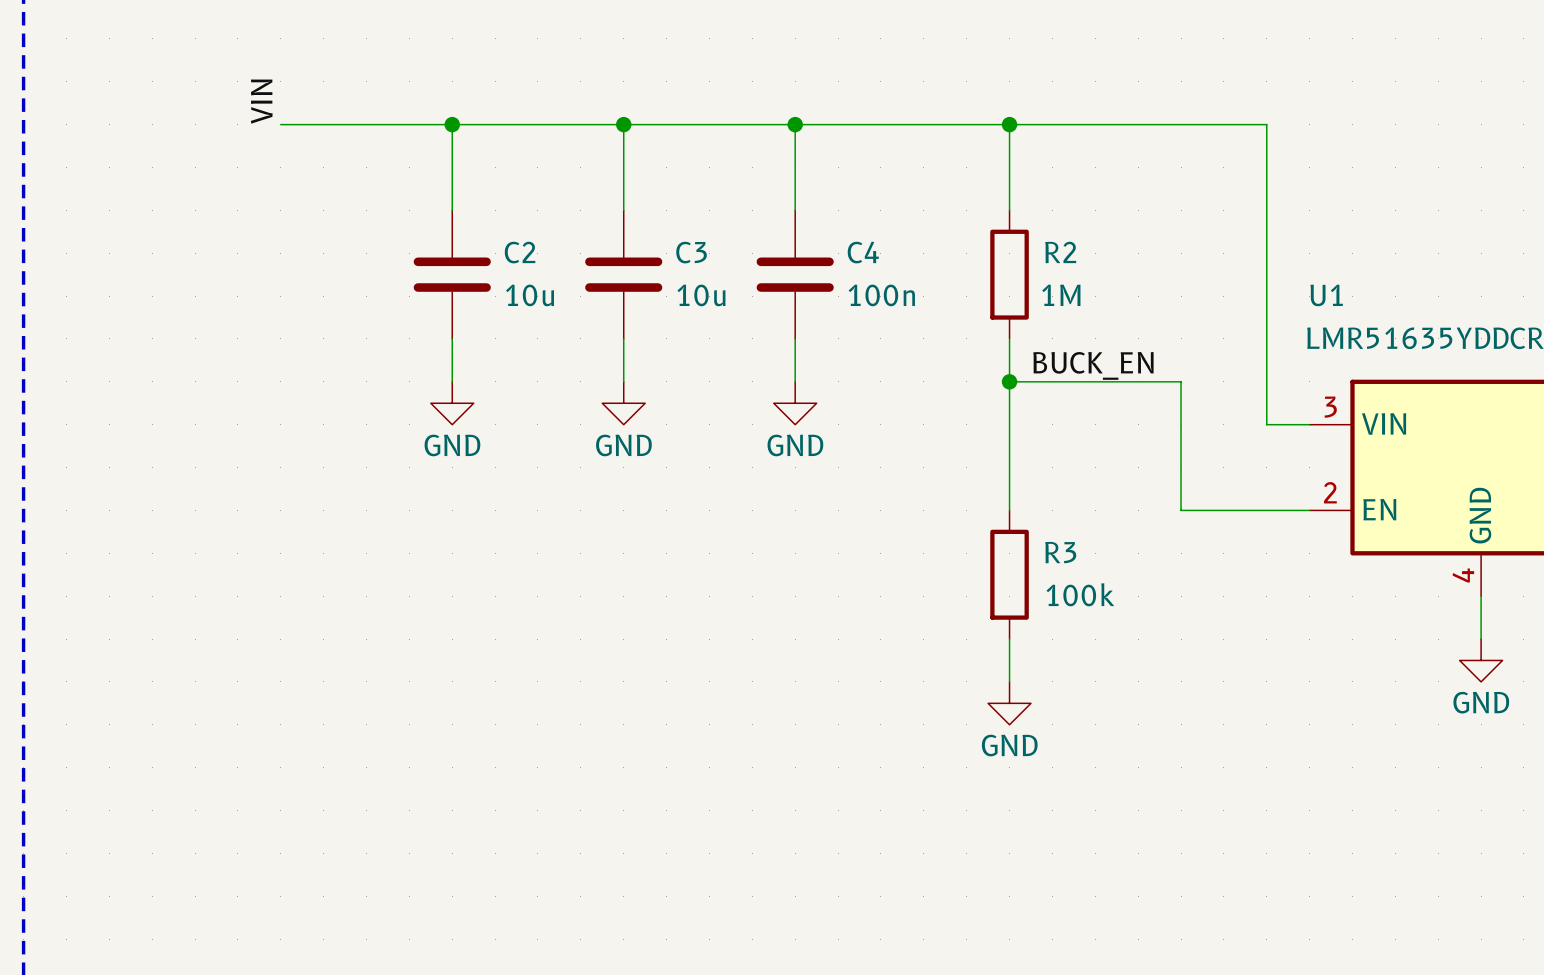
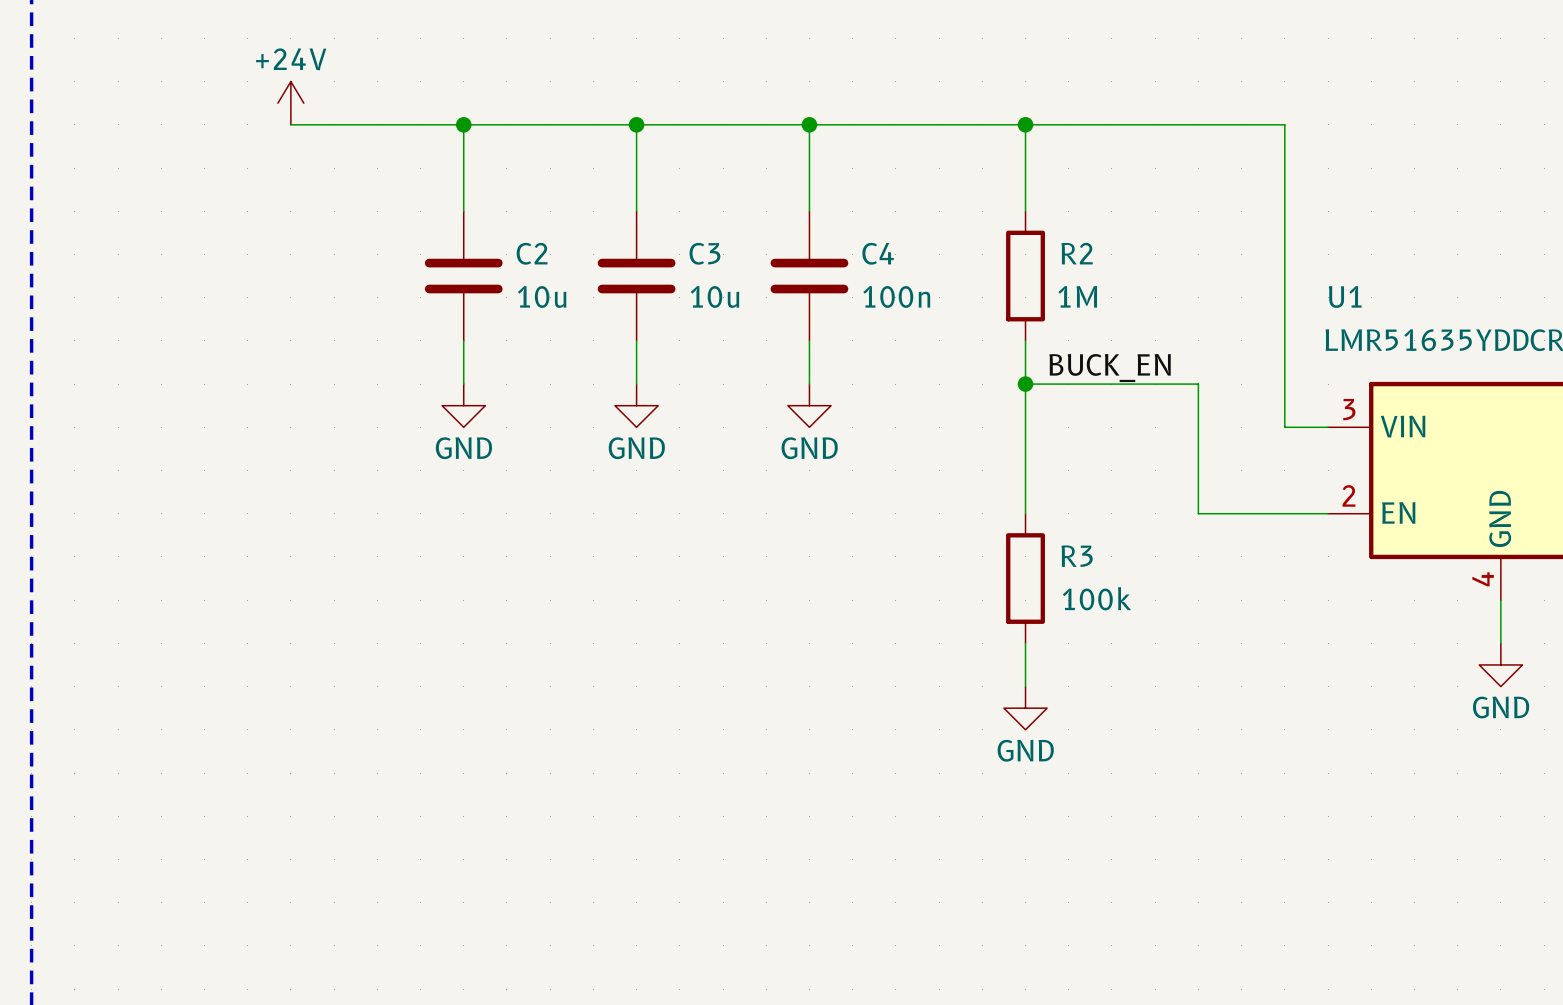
label: VIN (261, 101) -> none
power symbol: none -> +24V (290, 103)

